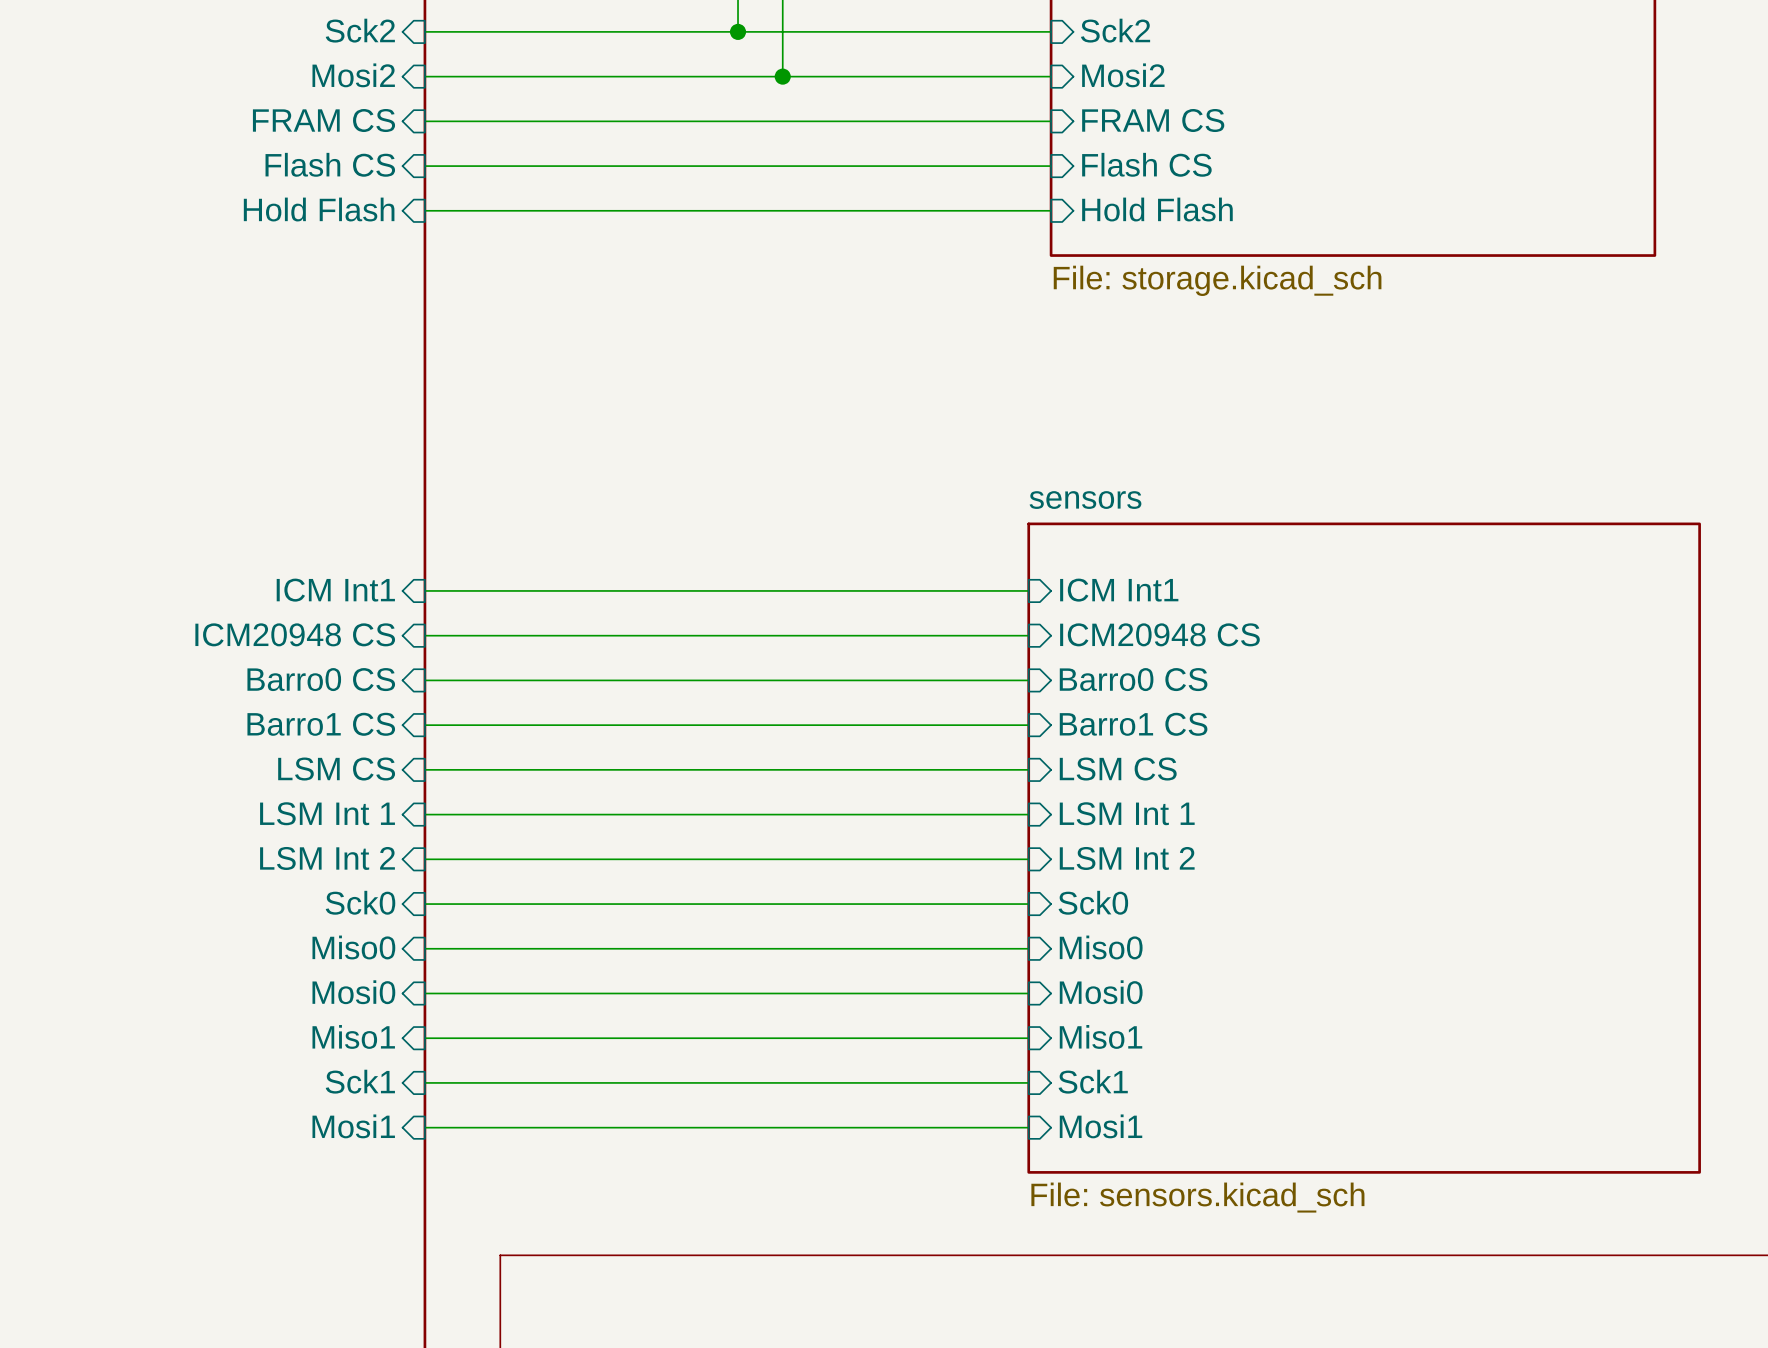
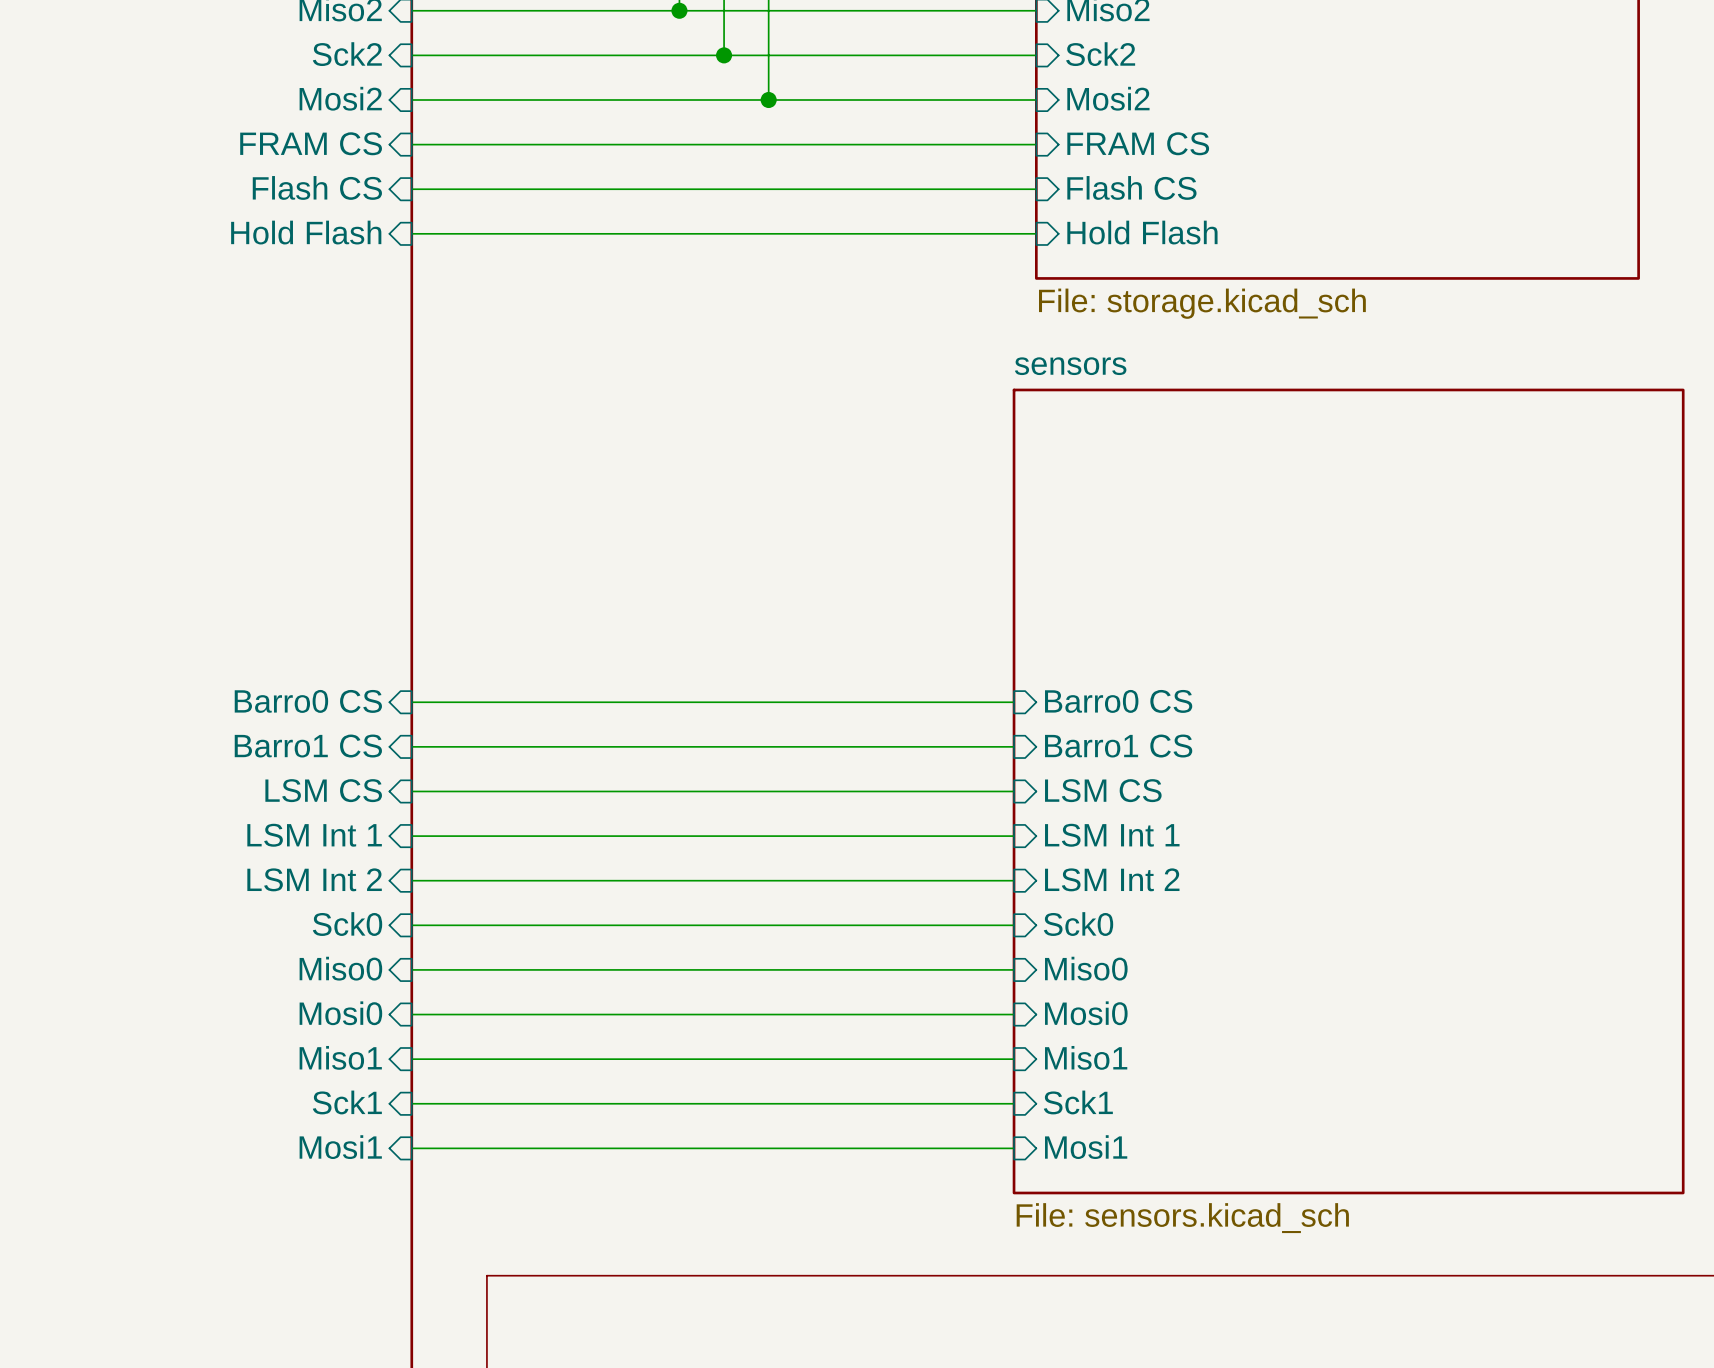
sheet pin: ICM Int1 (335, 590) -> none
wire: (424, 590) (1028, 590) -> none
sheet pin: ICM Int1 (1119, 590) -> none
sheet pin: ICM20948 CS (295, 634) -> none
sheet pin: ICM20948 CS (1159, 634) -> none
wire: (424, 635) (1028, 635) -> none
sheet sensors: none -> File: sensors.kicad_sch (1348, 791)
sheet sensors: File: sensors.kicad_sch (1364, 848) -> none

